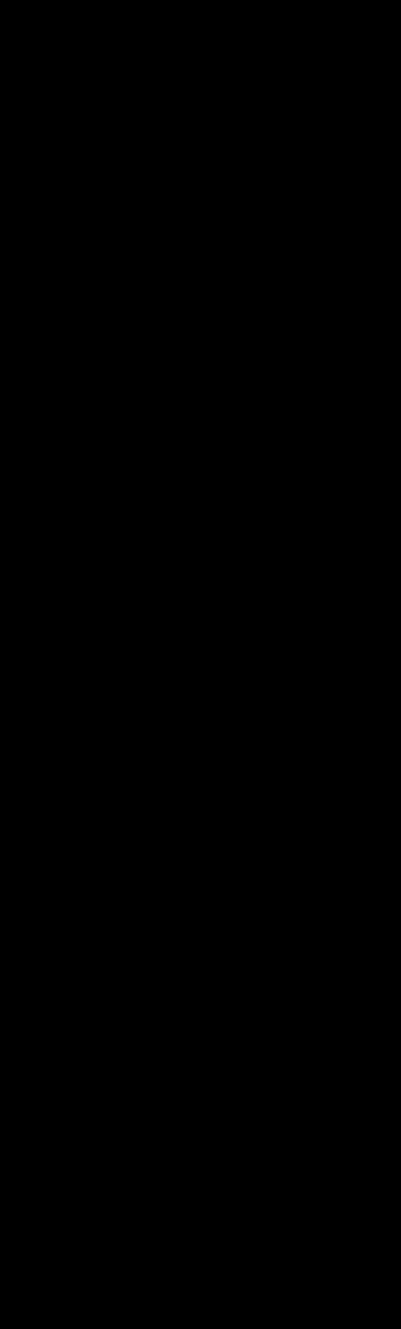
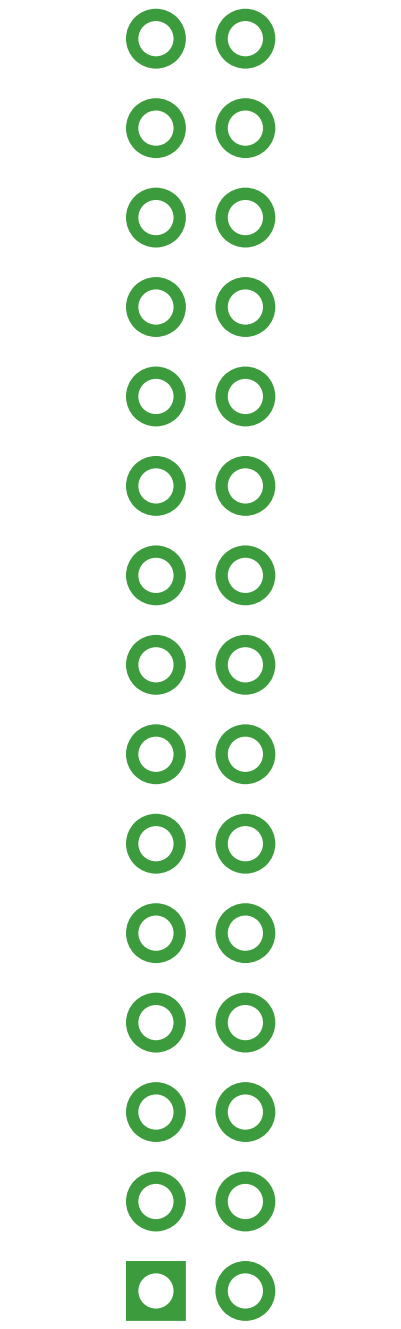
part: none -> (200, 664)

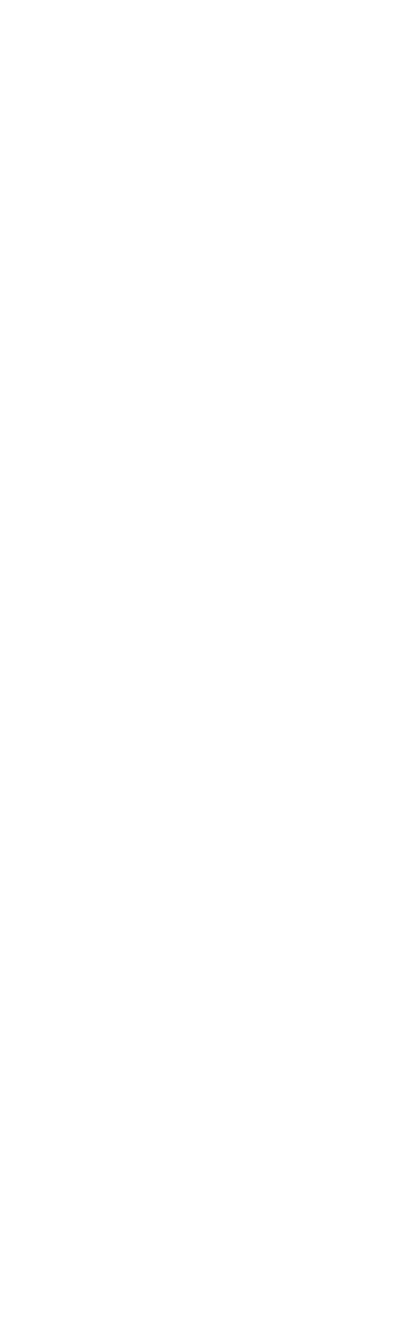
part: (200, 664) -> none

